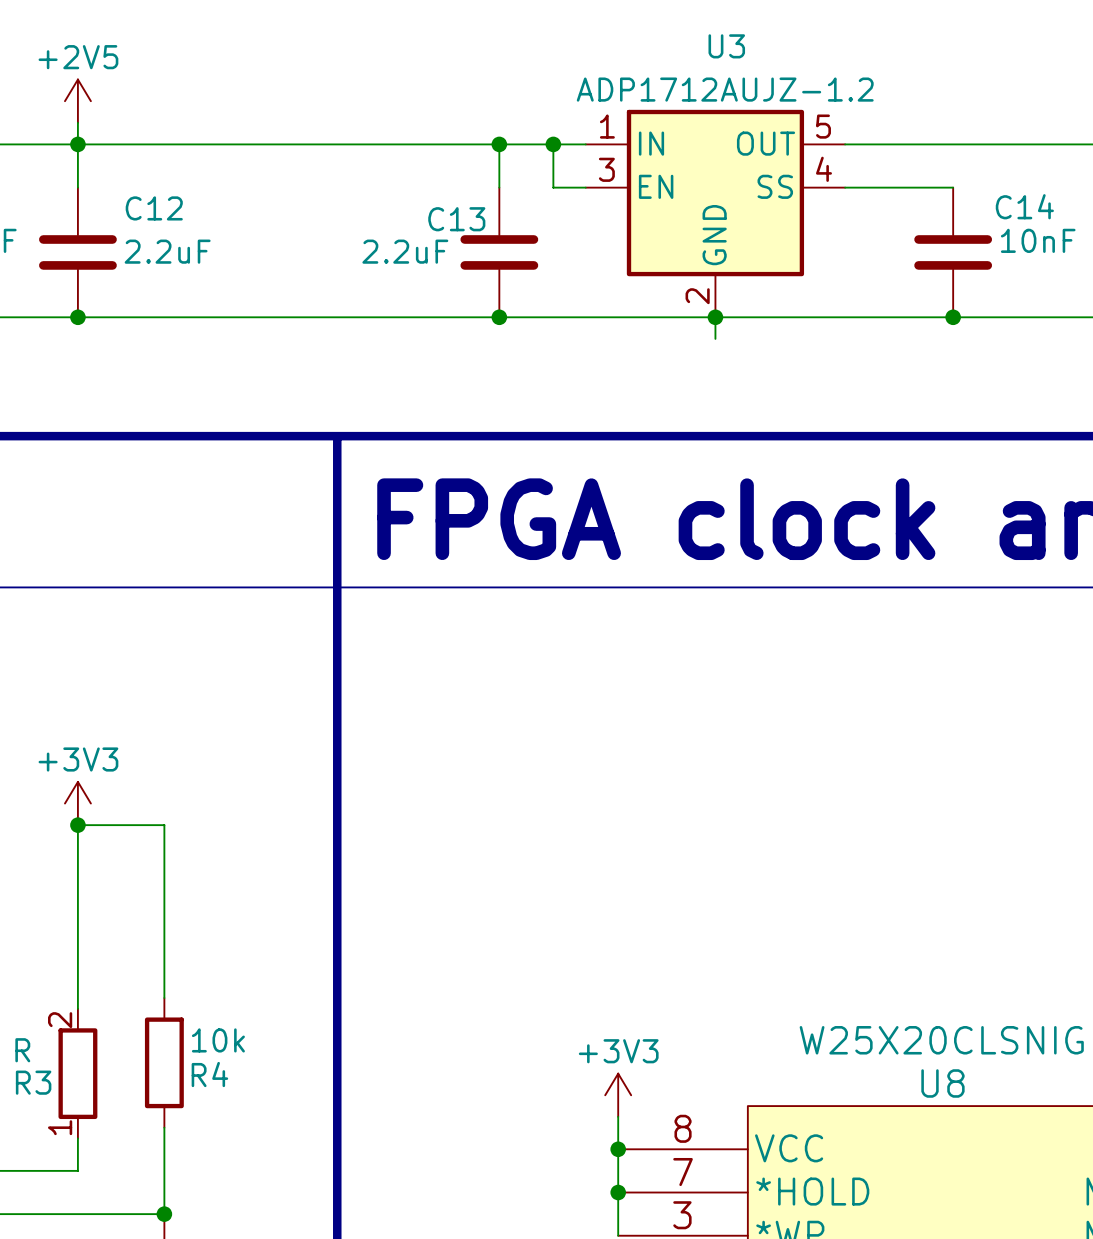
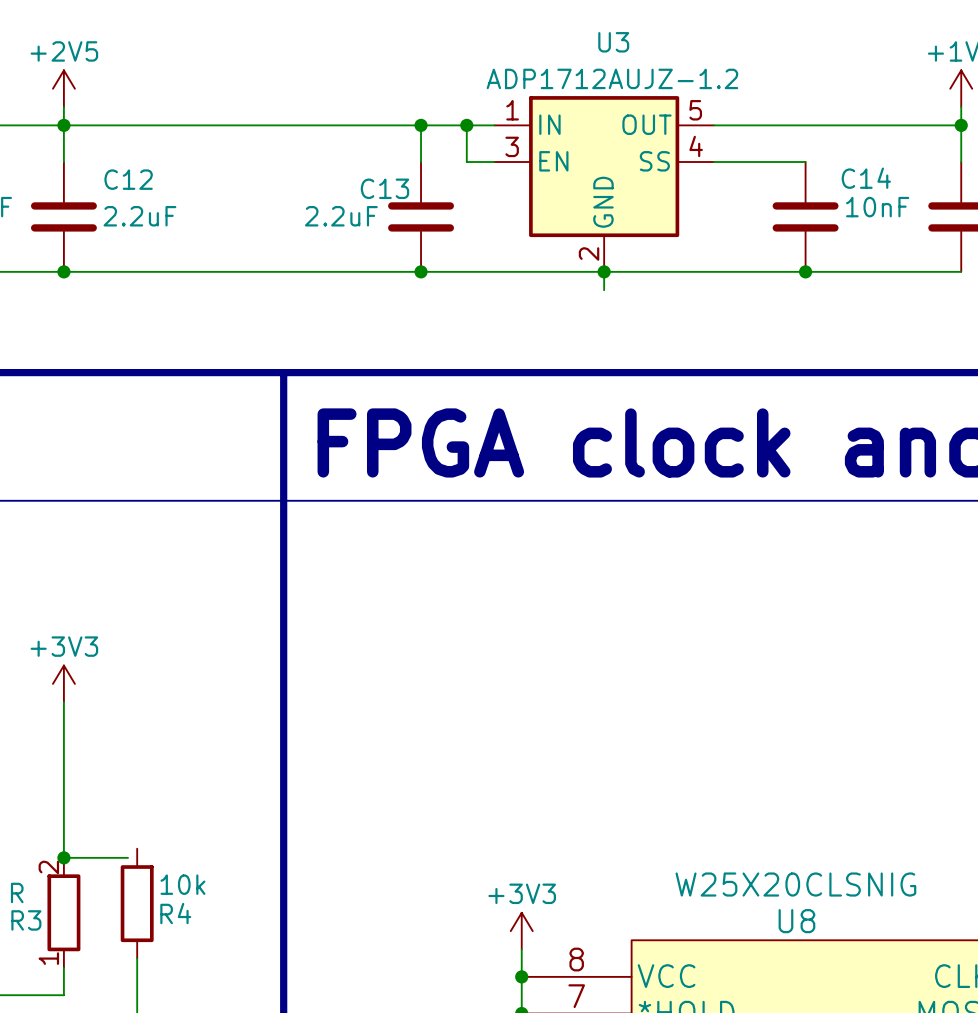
wire: (77, 825) (164, 825) (164, 998) -> none
junction: (77, 825) -> none
wire: none -> (63, 857) (128, 857)
junction: none -> (63, 857)

